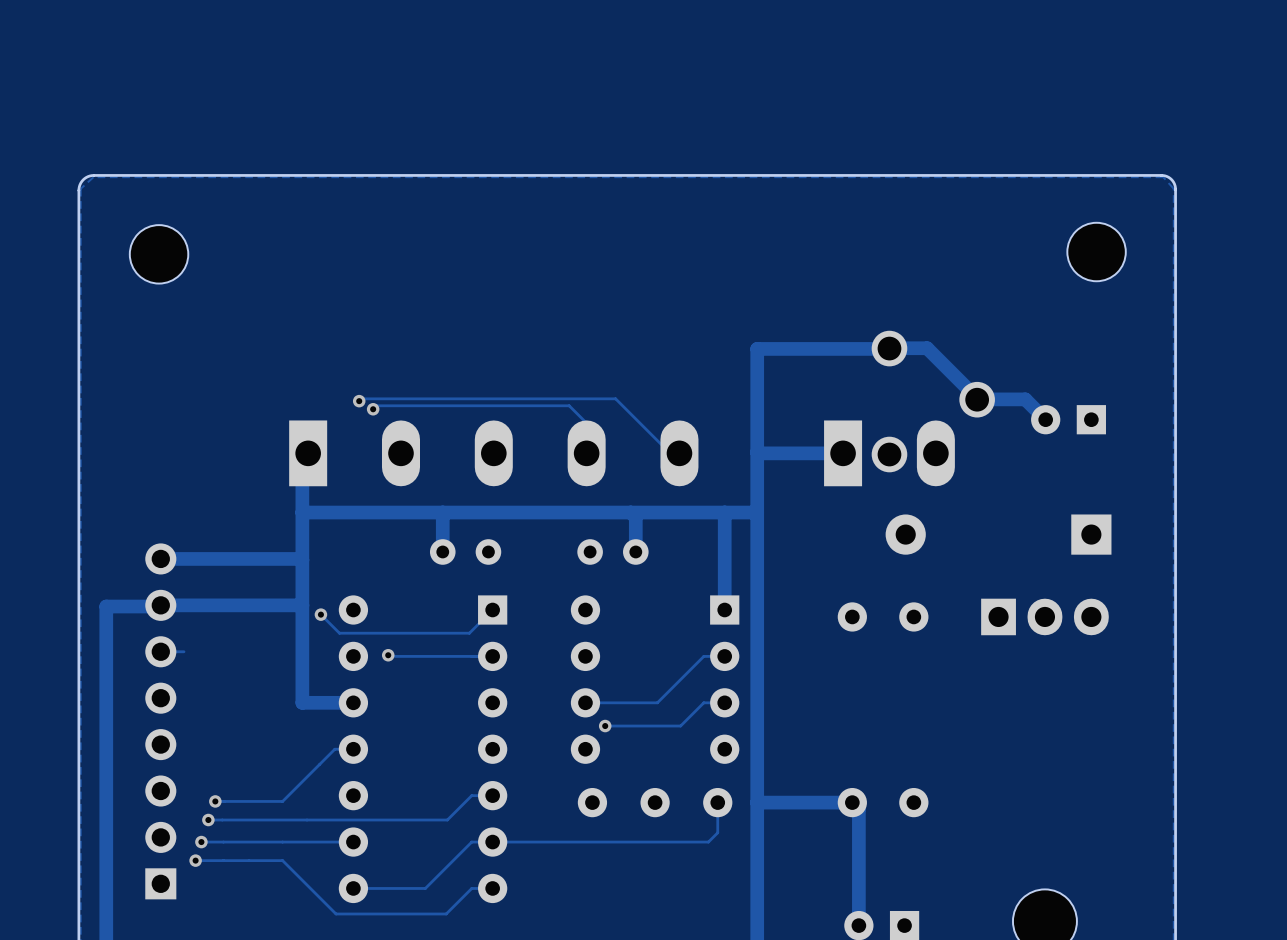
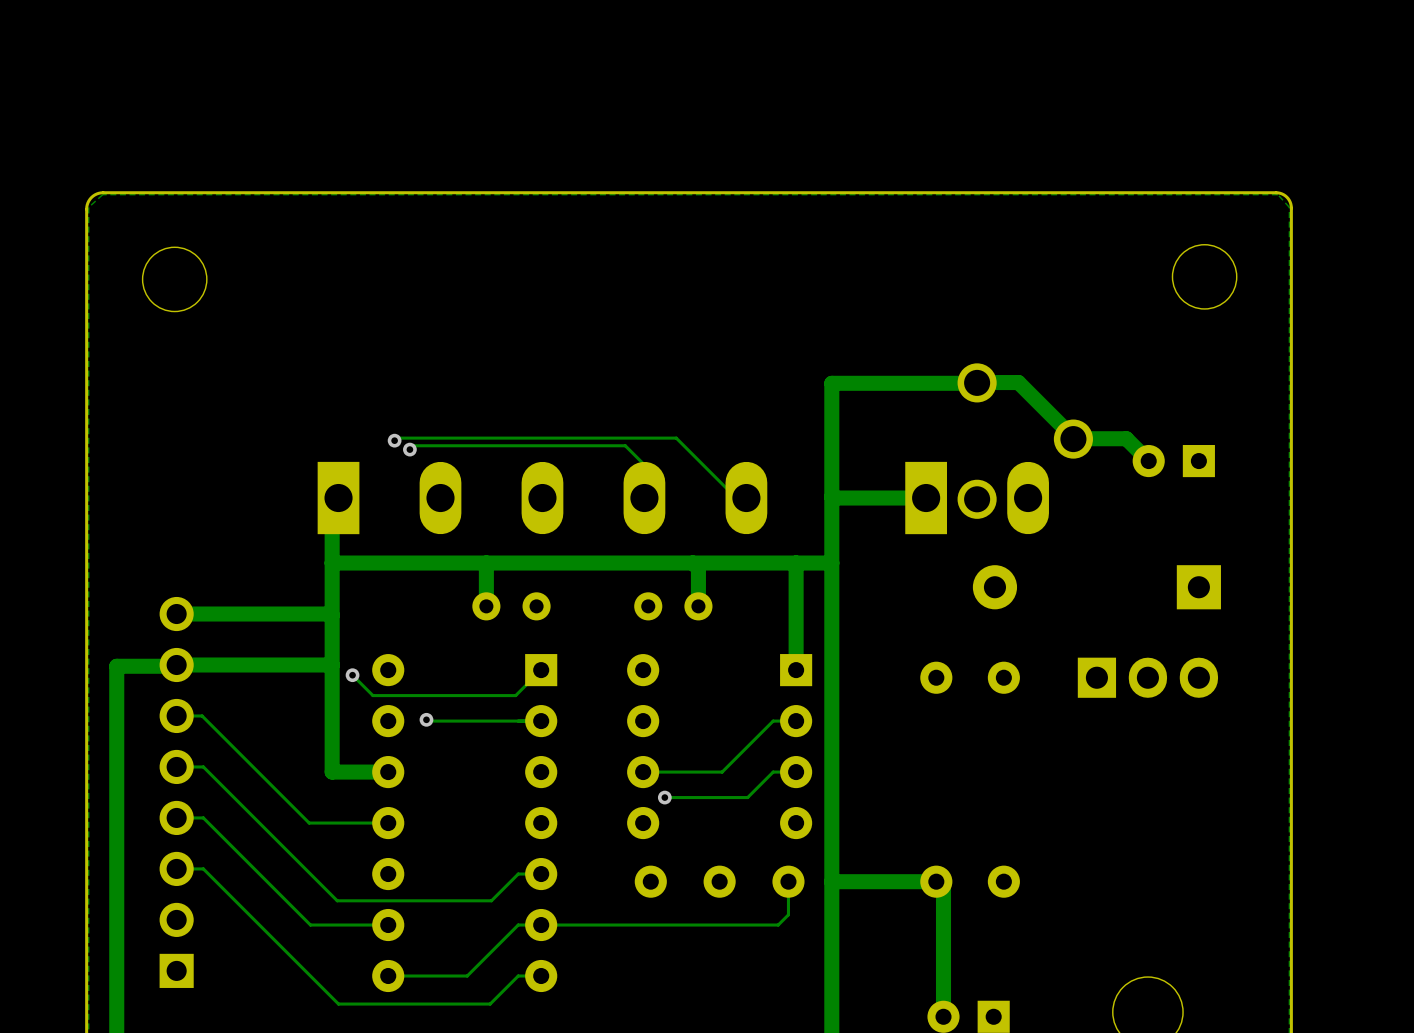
track: (334, 749) (282, 801) (215, 801) -> (367, 823) (309, 823) (202, 715)
via: (215, 801) -> none
via: (208, 820) -> none
track: (307, 820) (208, 820) -> (337, 900) (203, 766) (176, 766)
via: (201, 842) -> none
track: (282, 842) (201, 842) -> (310, 925) (203, 817) (176, 817)
track: (195, 860) (282, 860) (336, 913) -> (176, 868) (203, 868) (338, 1004) (369, 1004)
via: (195, 860) -> none

